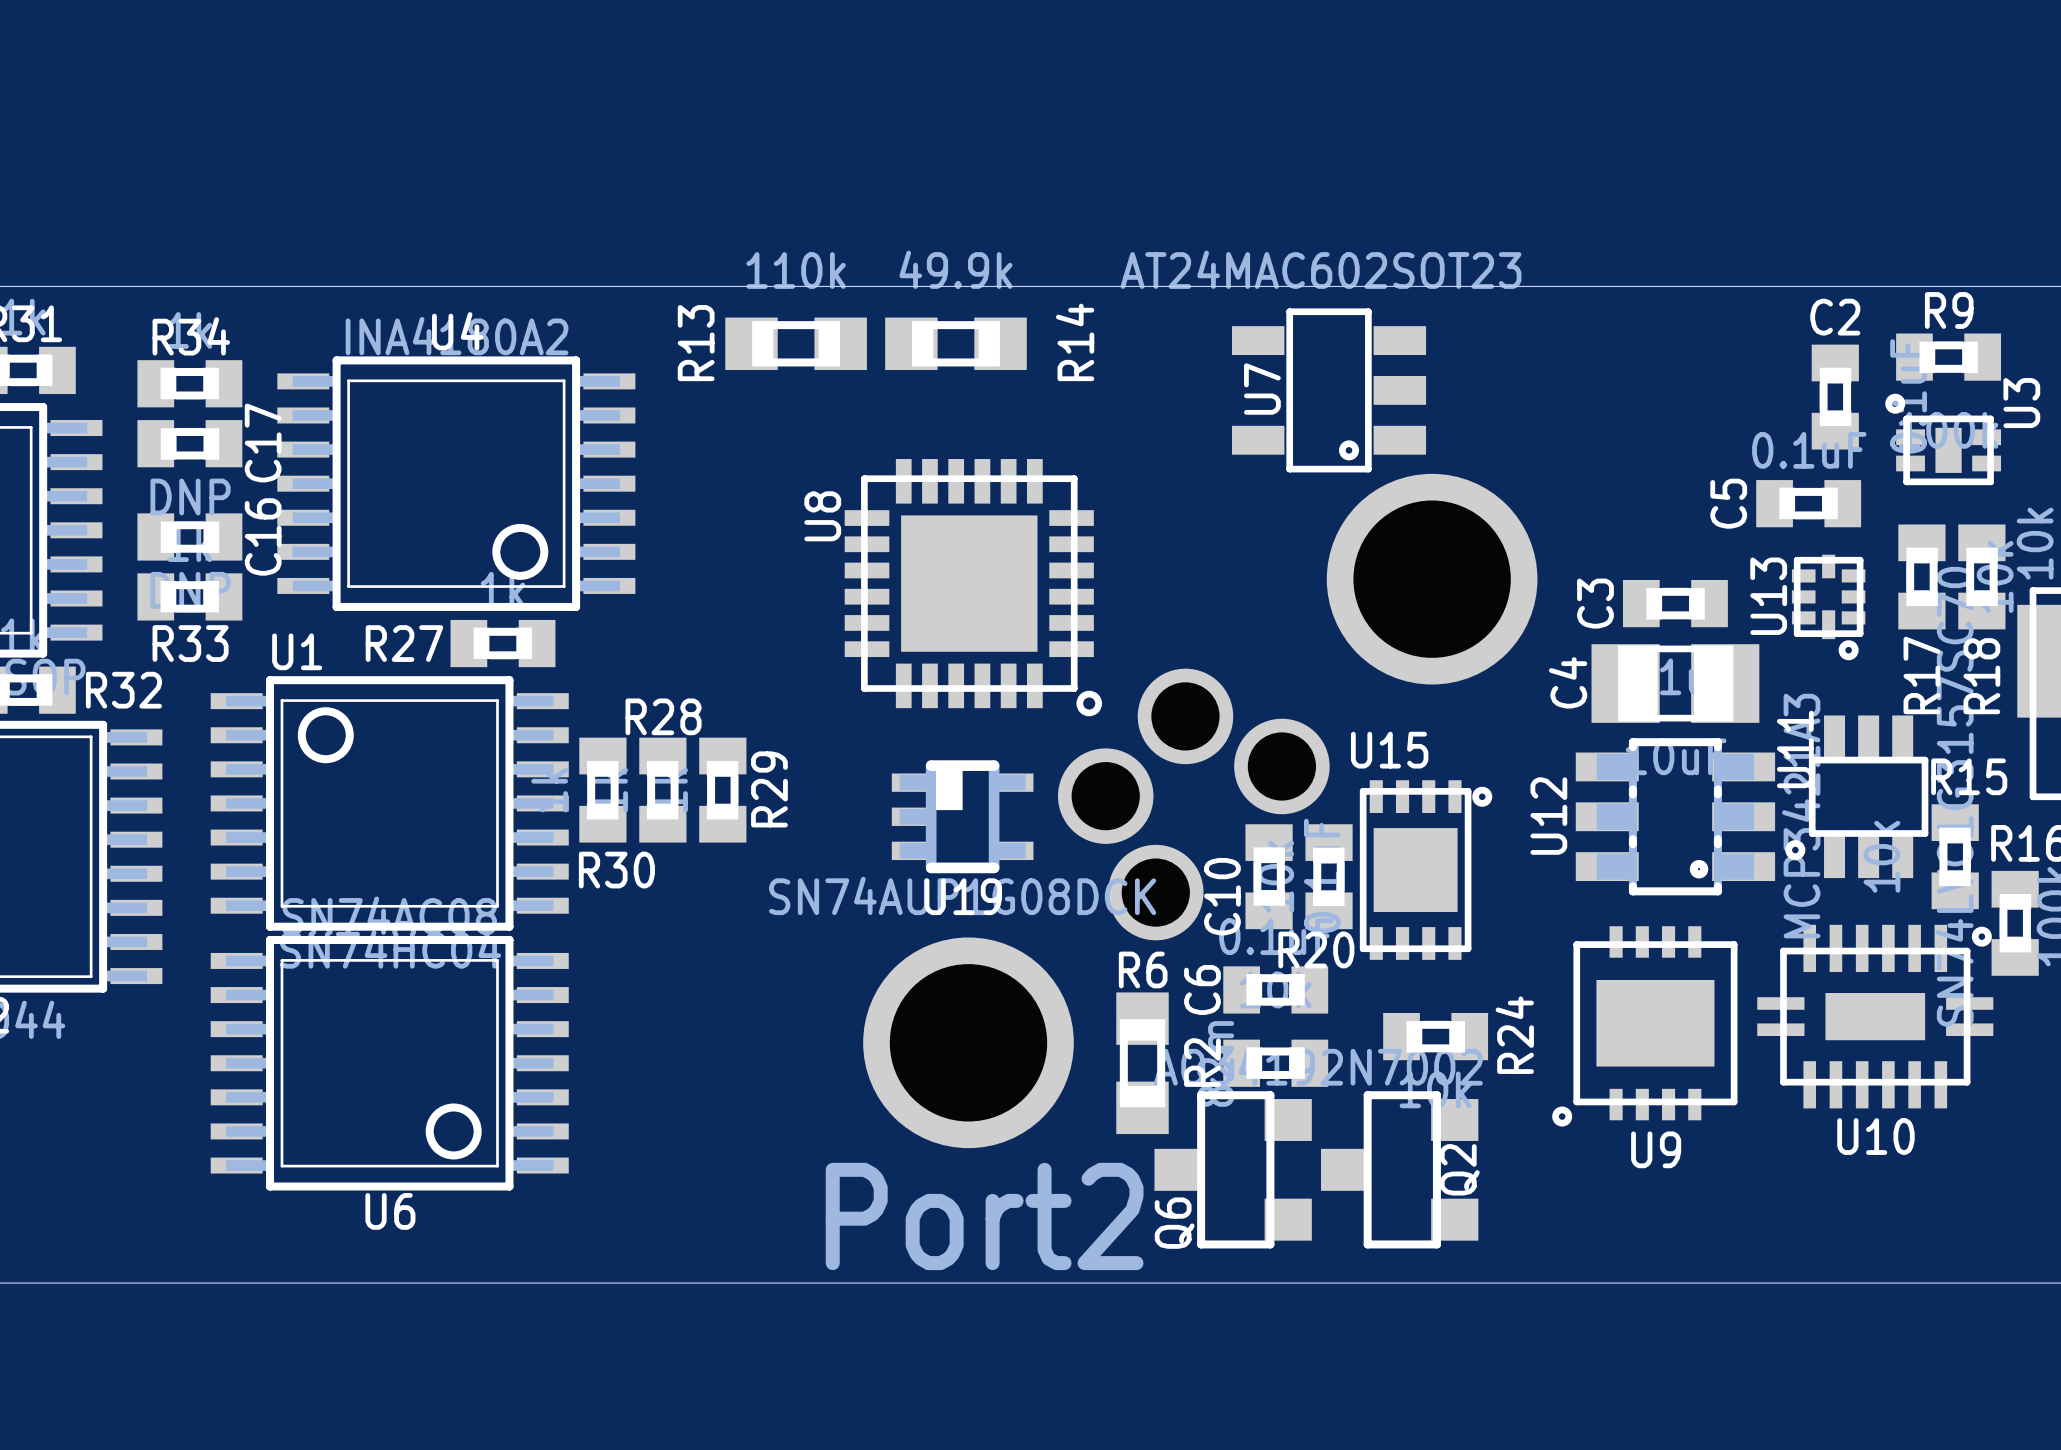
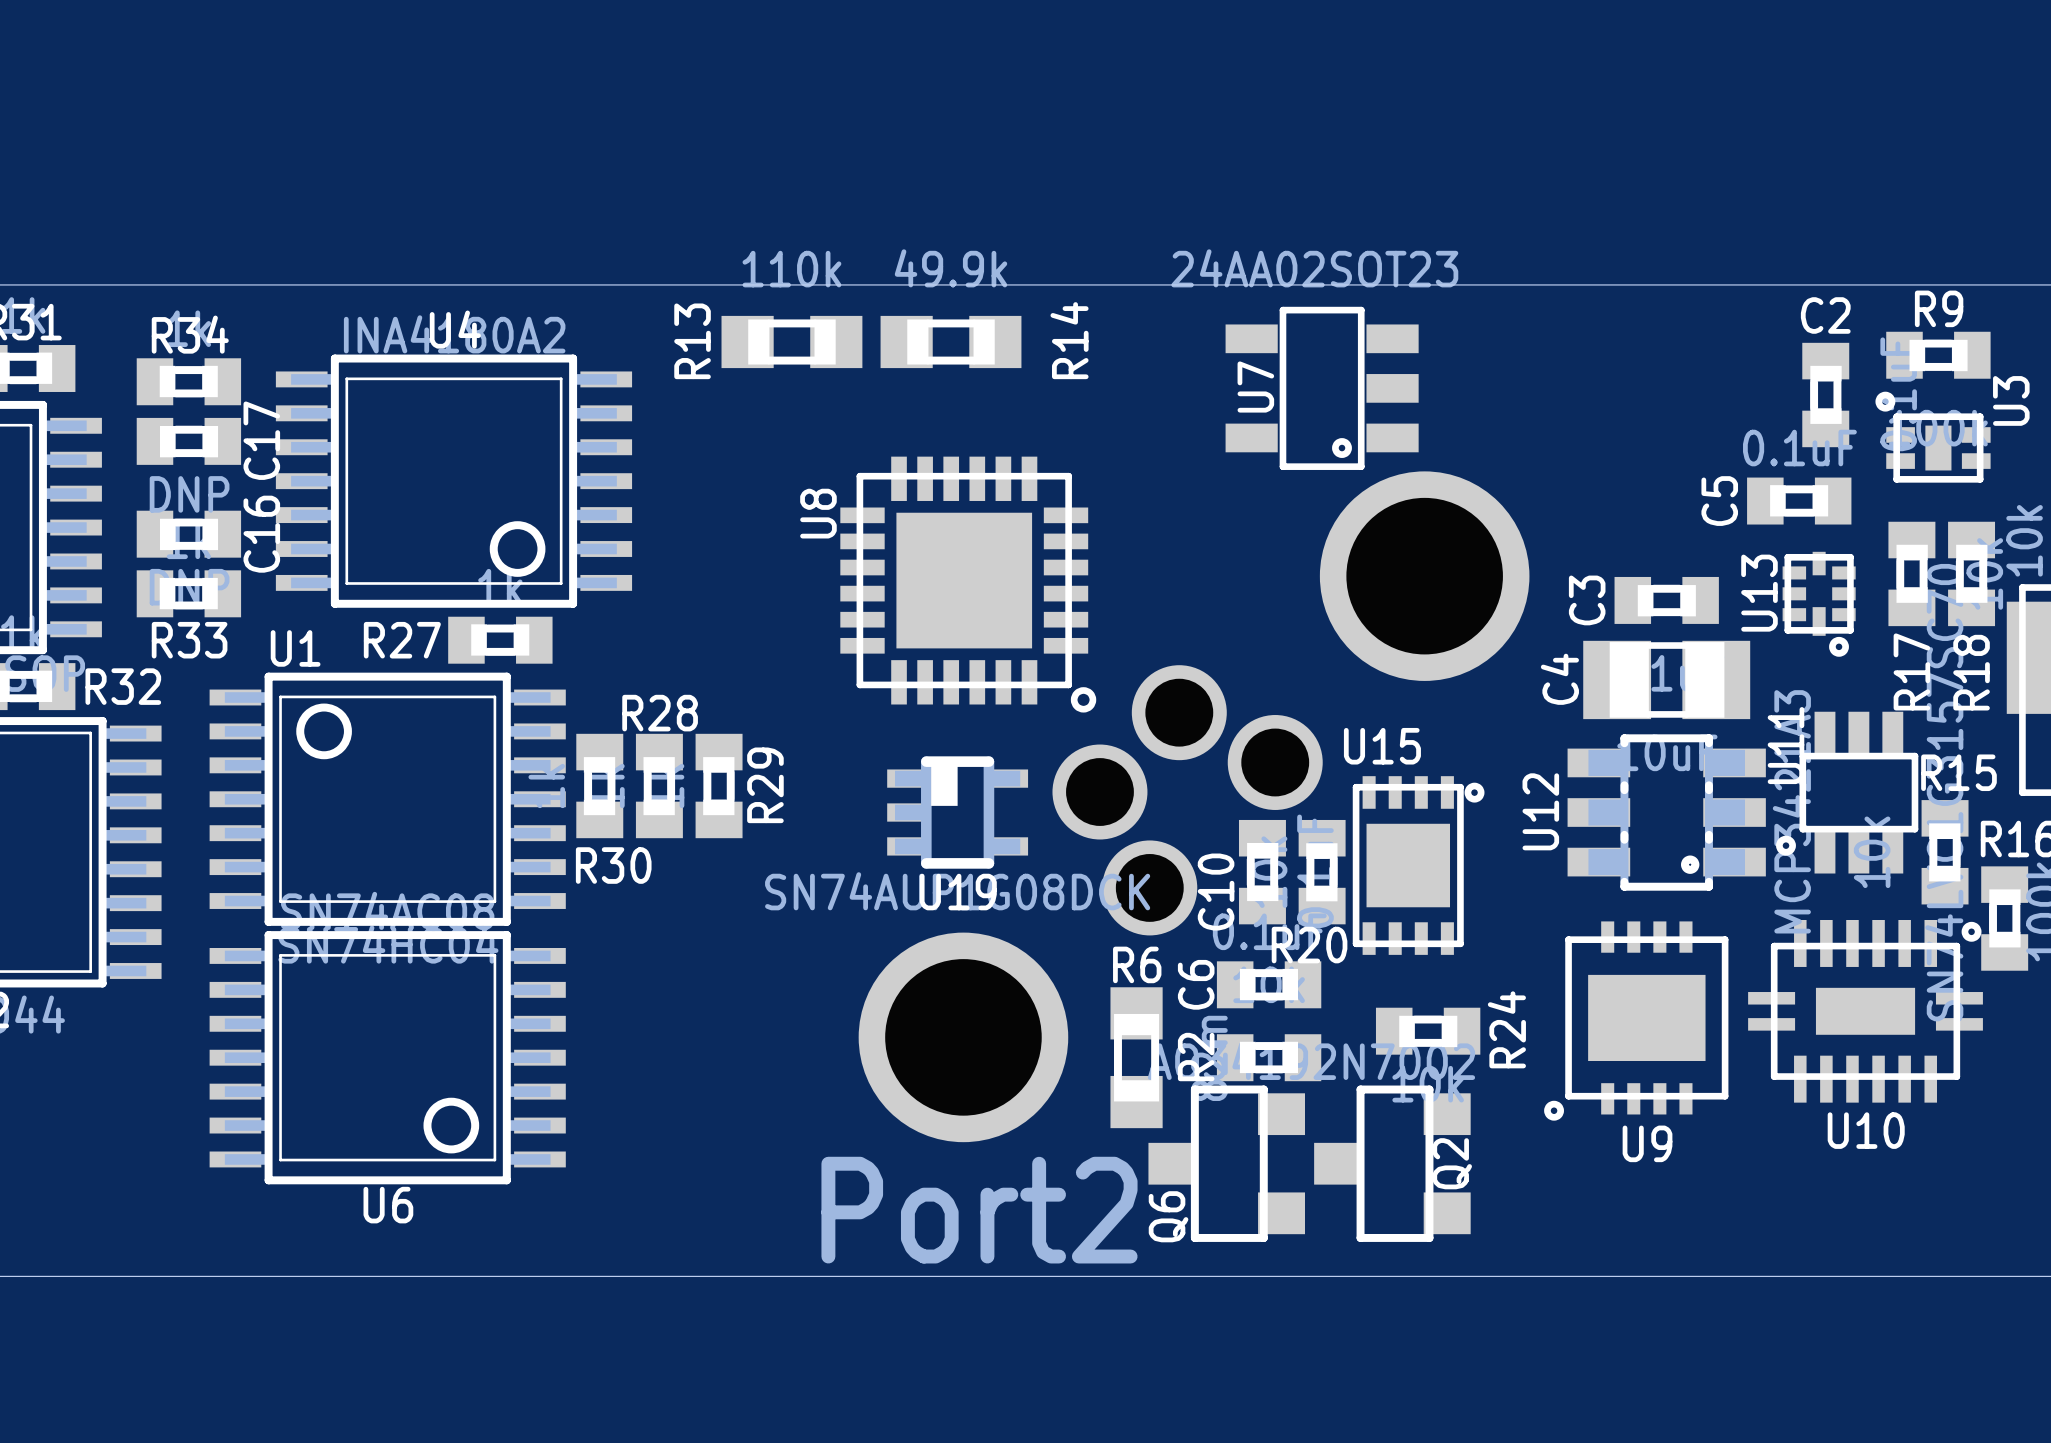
U7 value: AT24MAC602SOT23 (1320, 269) -> 24AA02SOT23 (1314, 268)

